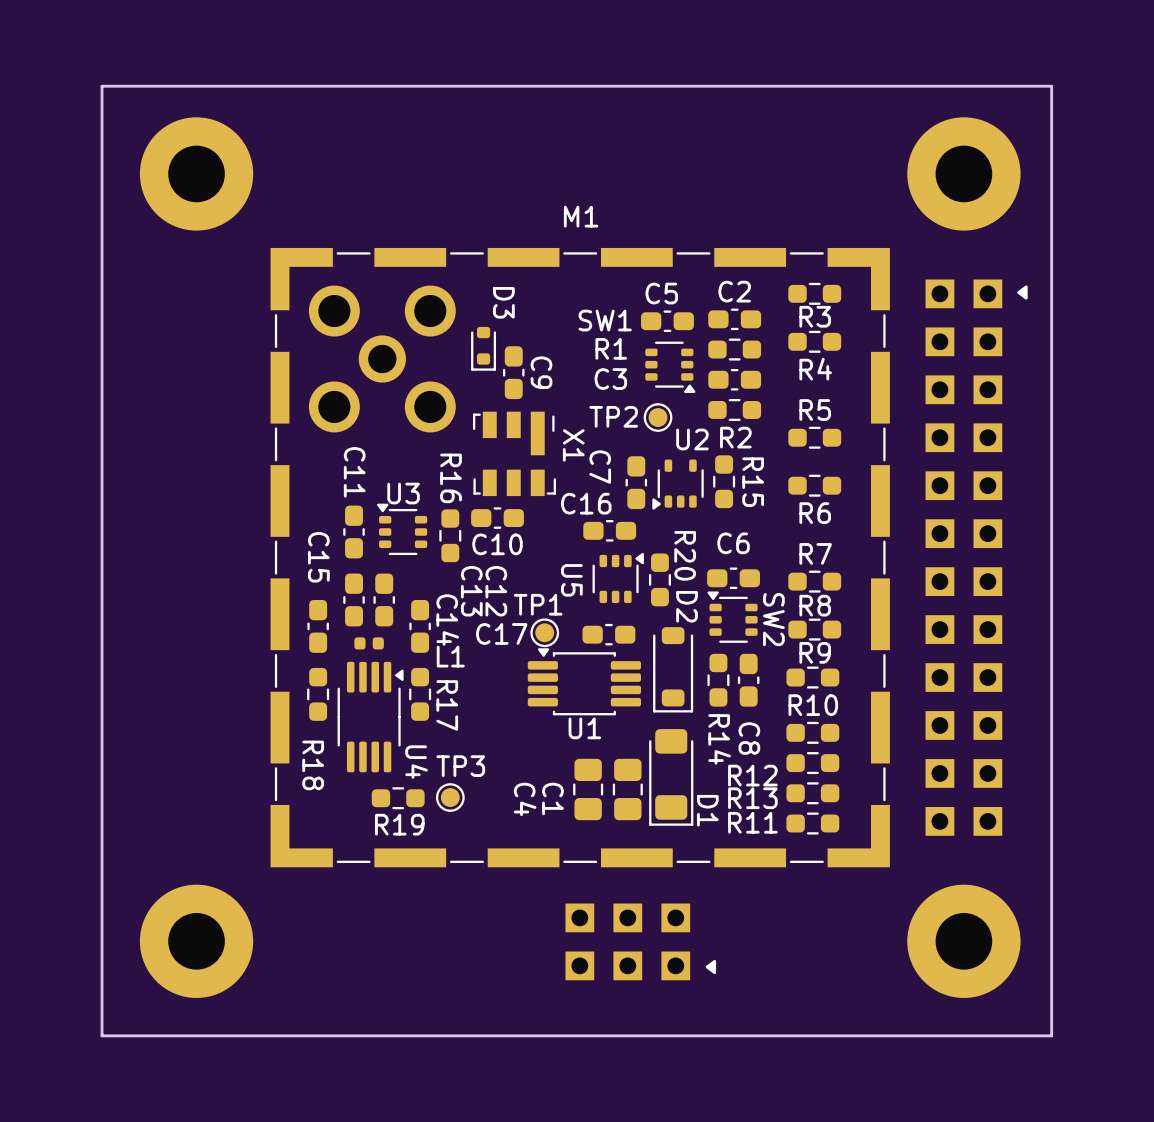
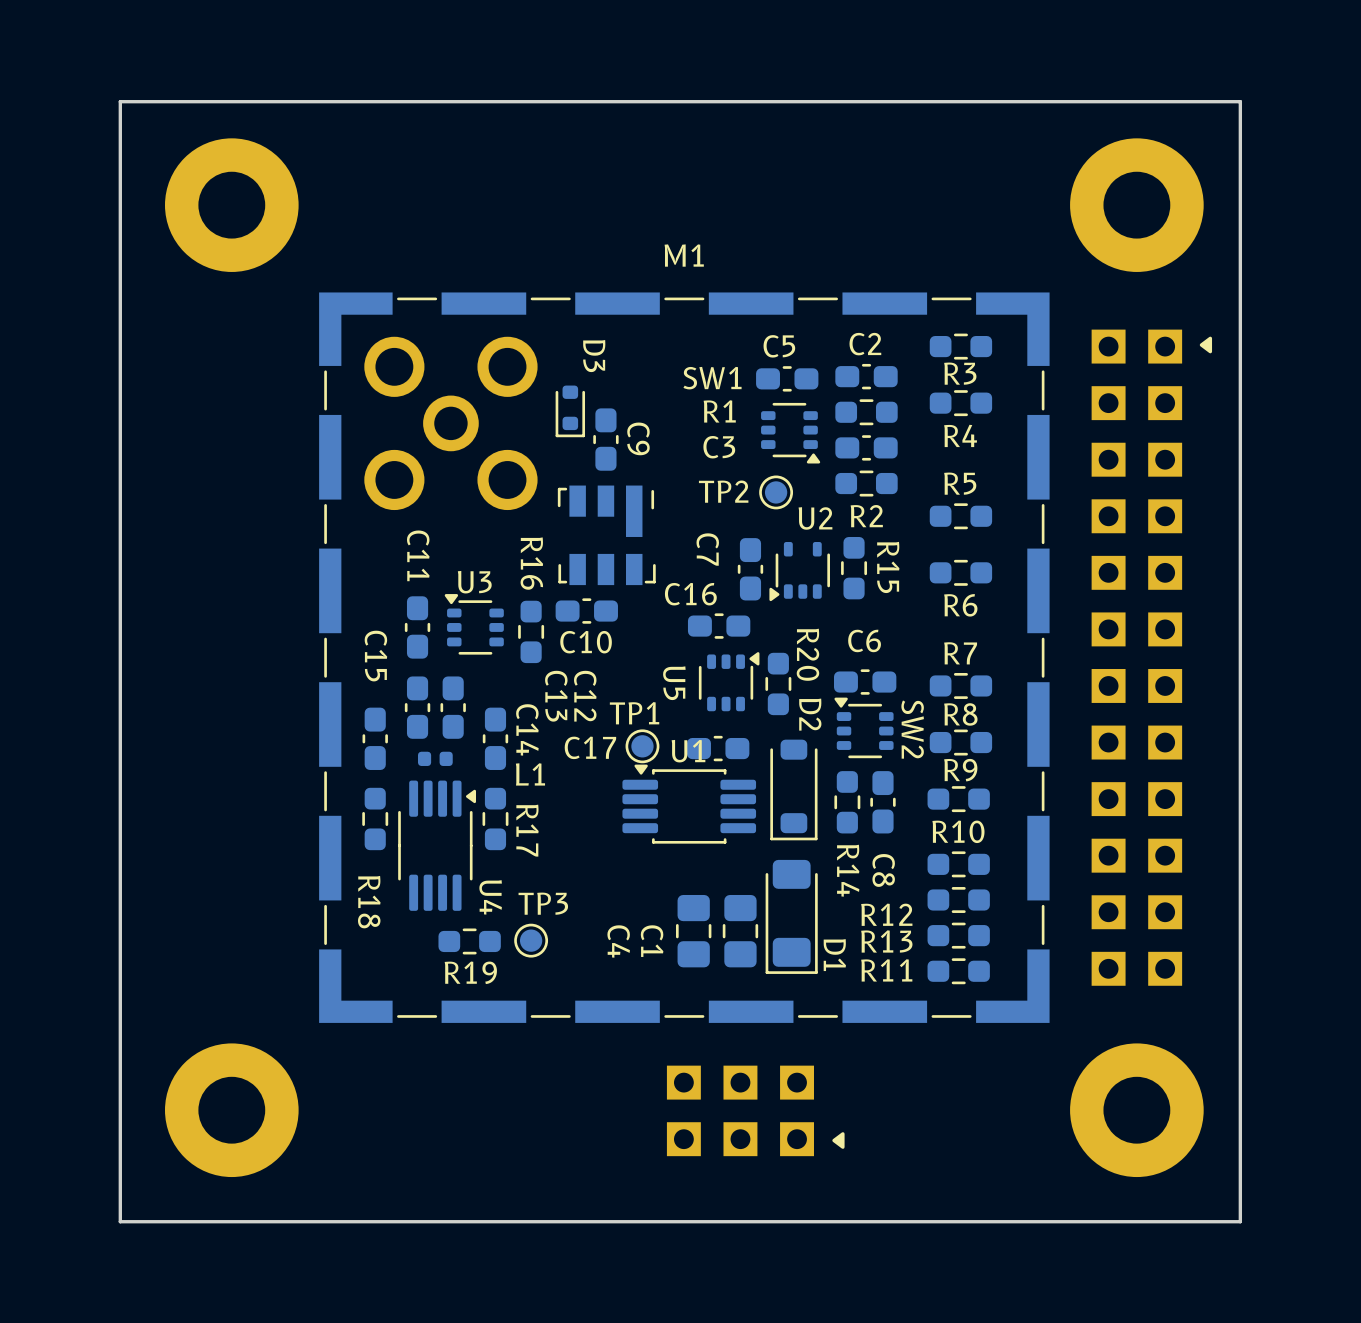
X1 name: X1 (573, 445) -> none
U1 name position: U1 (584, 728) -> U1 (688, 751)

